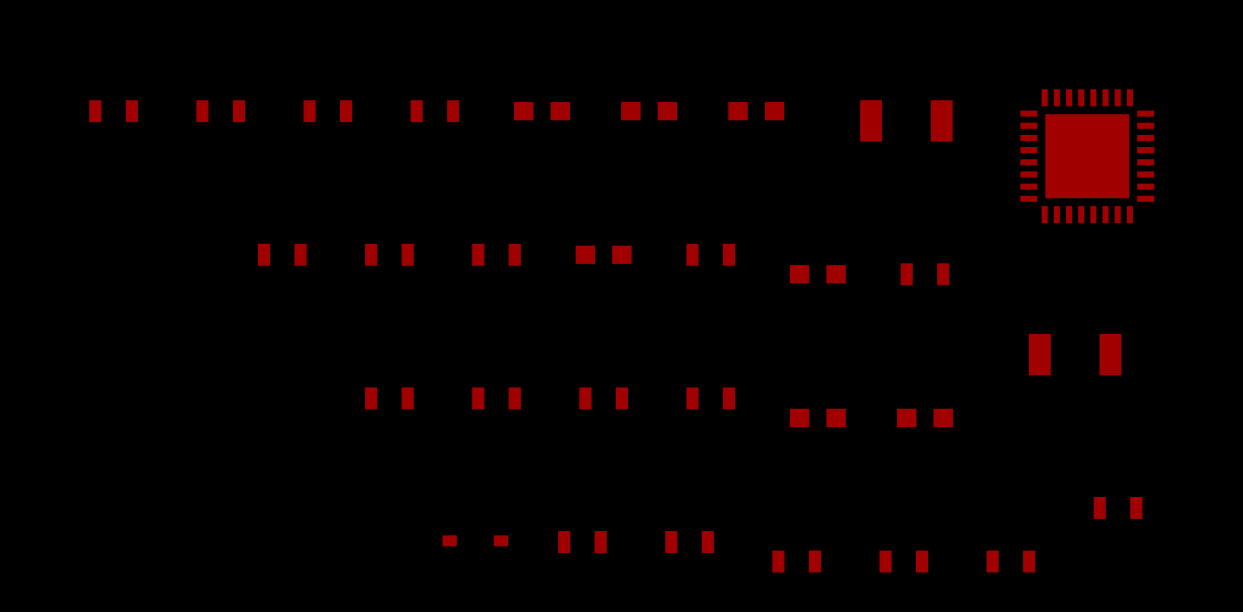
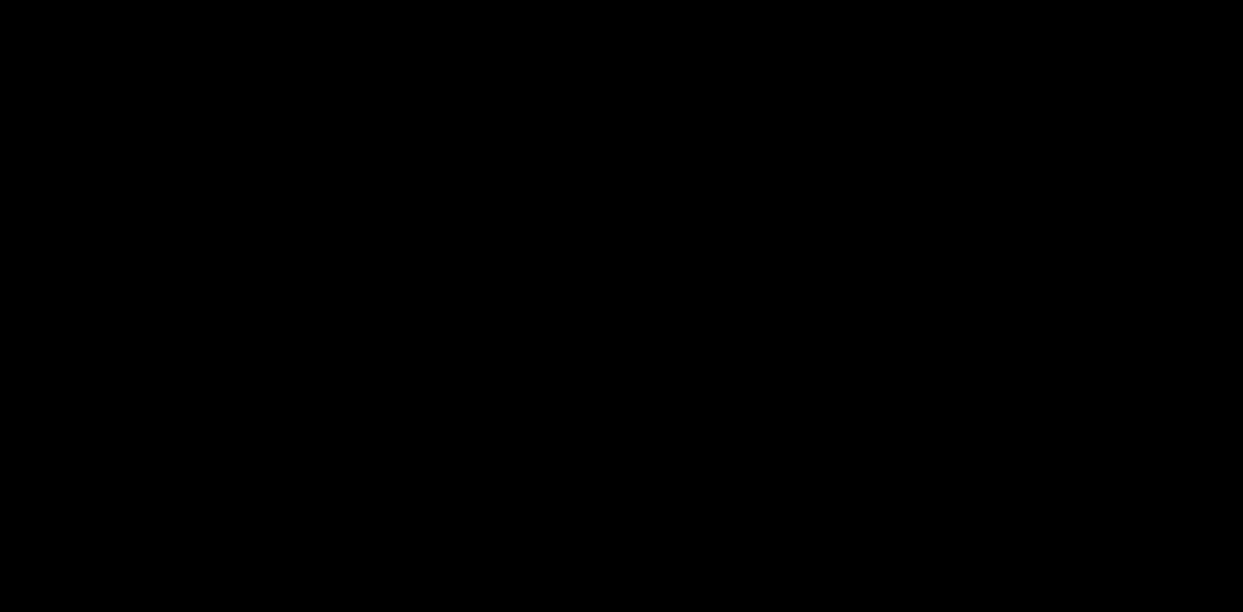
part: (113, 111) -> none
part: (220, 111) -> none
part: (327, 111) -> none
part: (434, 111) -> none
part: (542, 111) -> none
part: (649, 111) -> none
part: (756, 111) -> none
part: (906, 120) -> none
part: (1087, 156) -> none
part: (282, 254) -> none
part: (389, 254) -> none
part: (496, 254) -> none
part: (603, 254) -> none
part: (710, 254) -> none
part: (817, 274) -> none
part: (924, 274) -> none
part: (1075, 354) -> none
part: (389, 398) -> none
part: (496, 398) -> none
part: (603, 398) -> none
part: (710, 398) -> none
part: (817, 417) -> none
part: (924, 417) -> none
part: (1118, 507) -> none
part: (475, 540) -> none
part: (582, 542) -> none
part: (689, 542) -> none
part: (796, 561) -> none
part: (903, 561) -> none
part: (1010, 561) -> none

